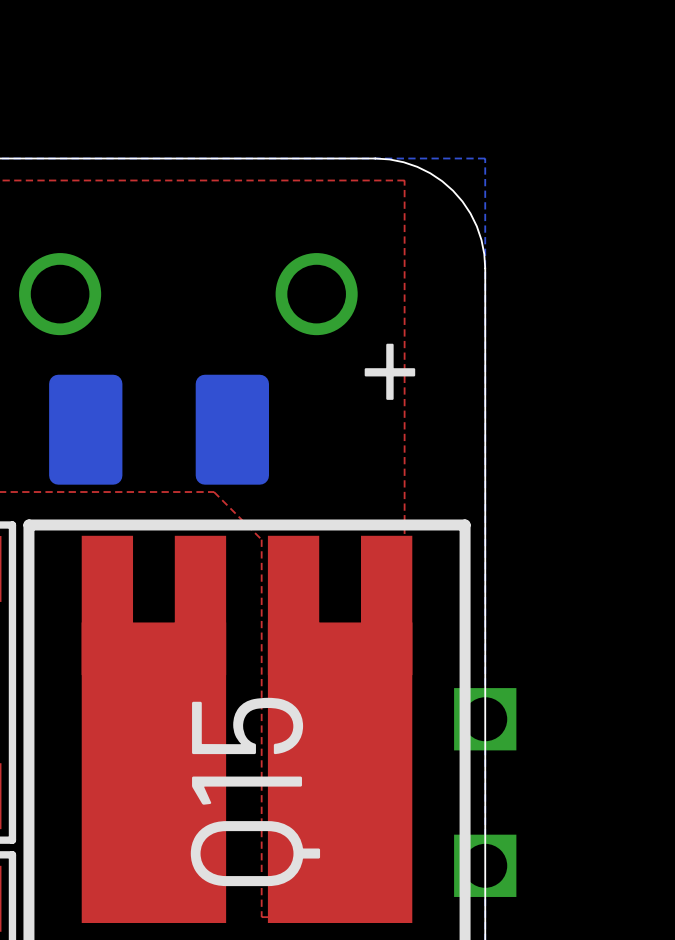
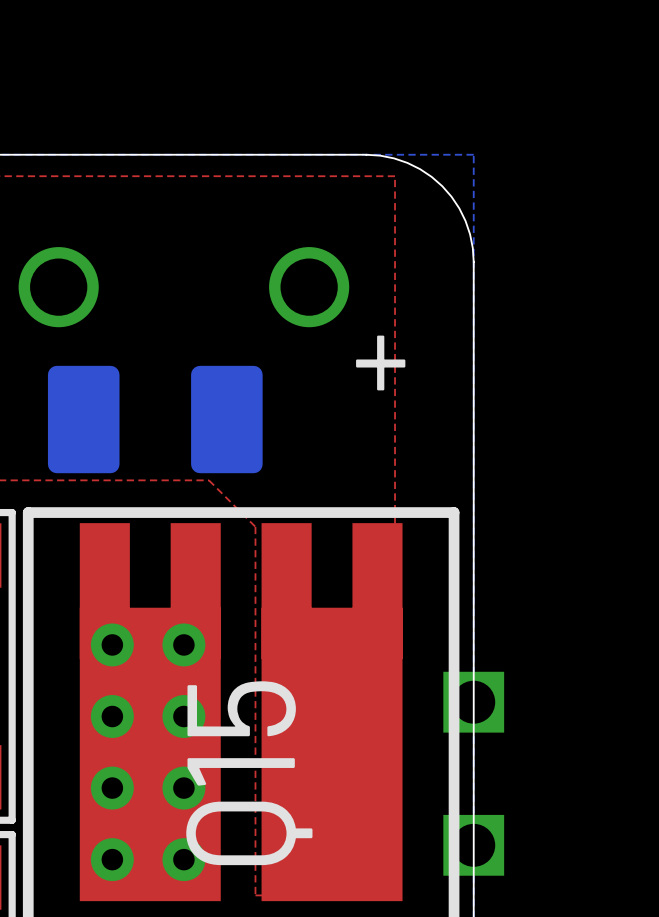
via: none -> (112, 644)
via: none -> (183, 644)
via: none -> (112, 716)
via: none -> (183, 716)
via: none -> (112, 788)
via: none -> (183, 788)
via: none -> (112, 859)
via: none -> (183, 859)

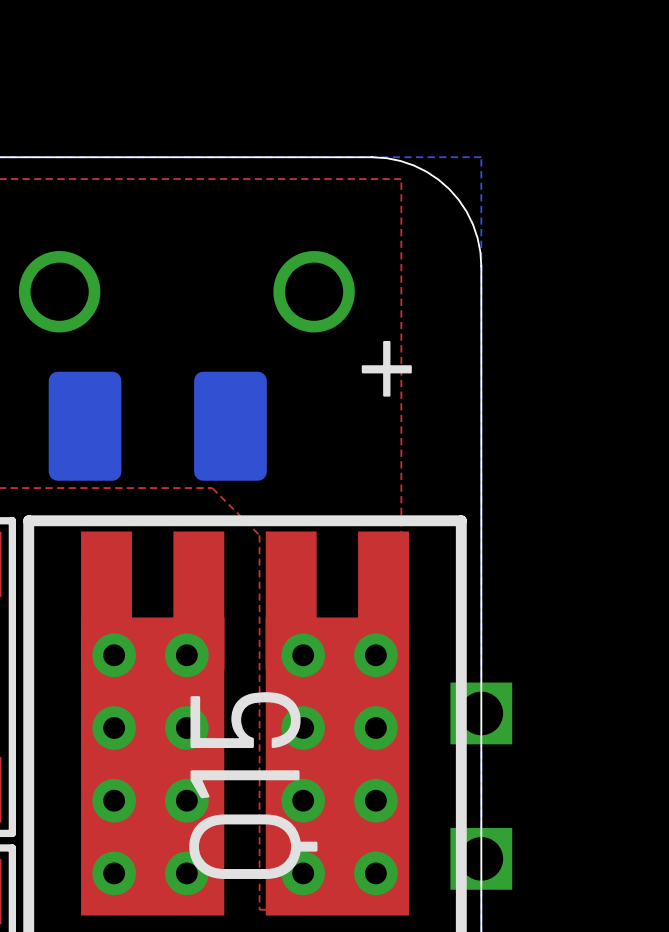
via: none -> (303, 655)
via: none -> (375, 655)
via: none -> (303, 727)
via: none -> (375, 727)
via: none -> (303, 800)
via: none -> (375, 800)
via: none -> (303, 873)
via: none -> (375, 873)

